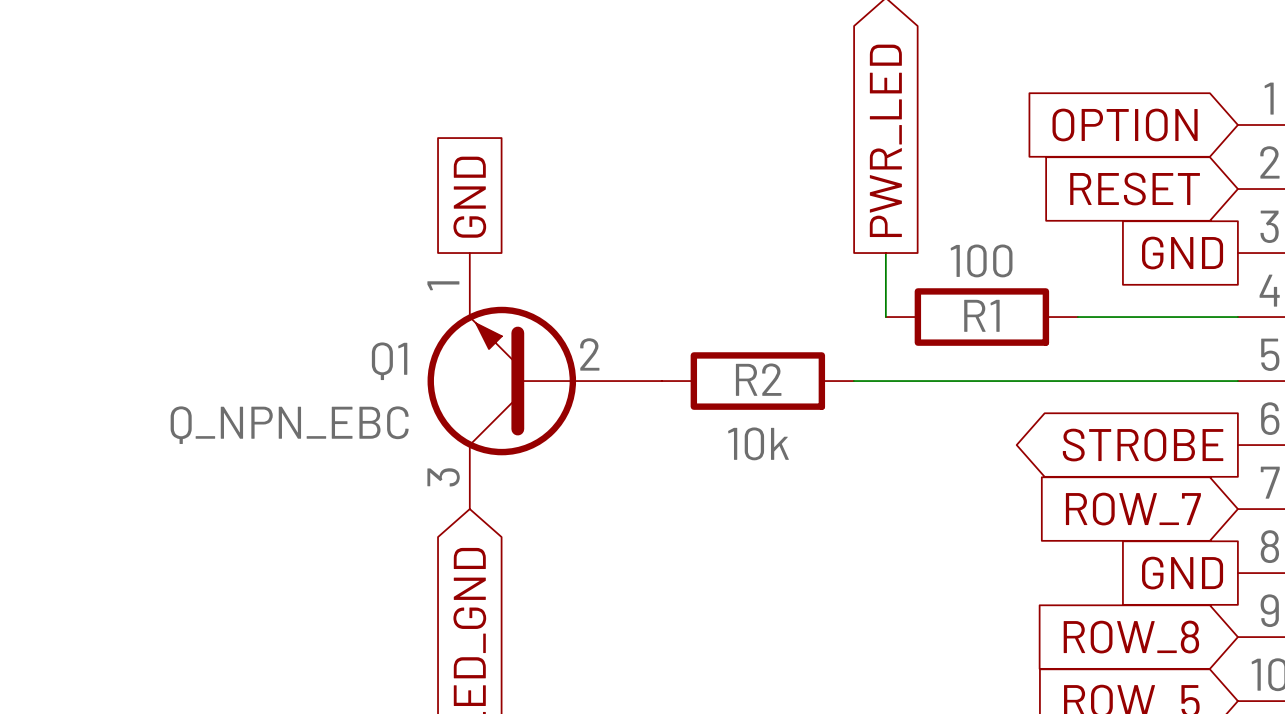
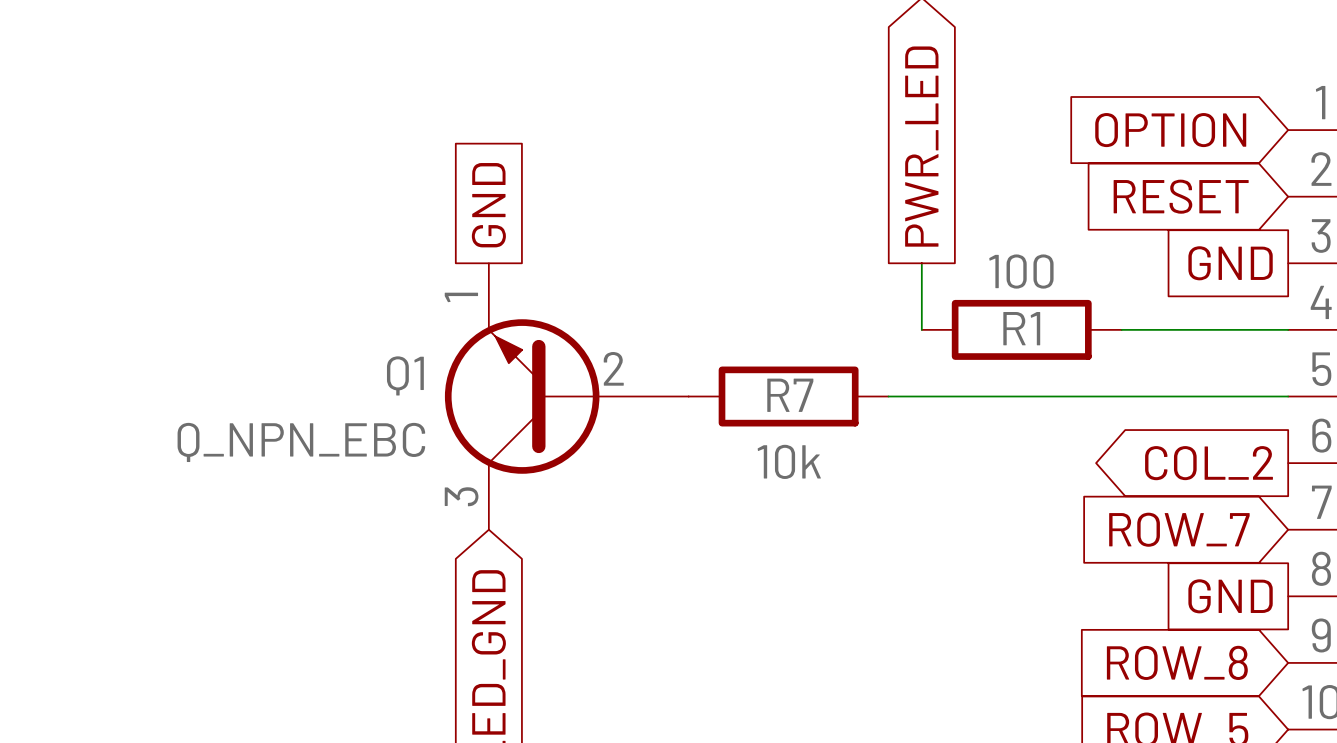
R2 name: R2 (758, 379) -> R7 (790, 395)
global label: STROBE (1143, 445) -> COL_2 (1209, 463)

